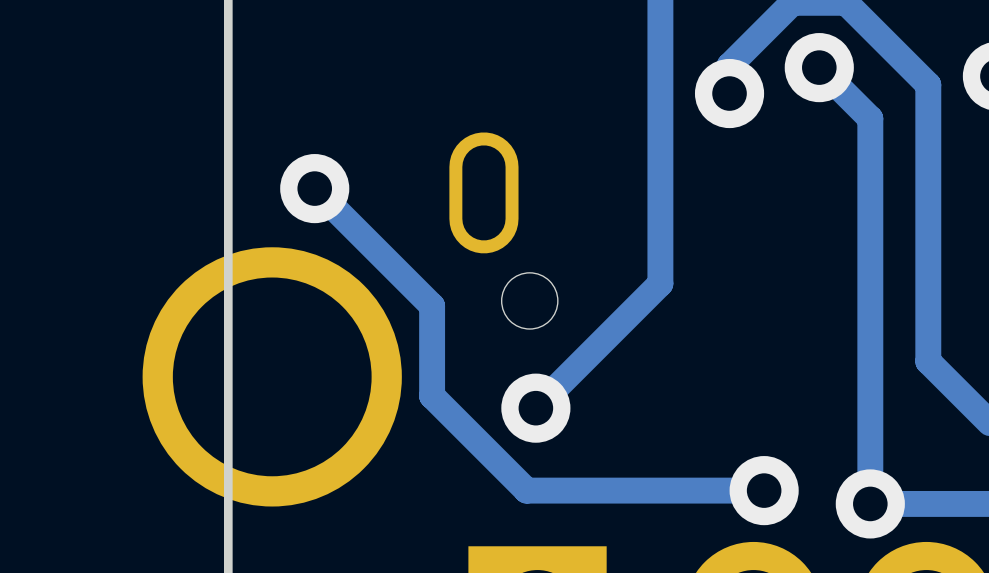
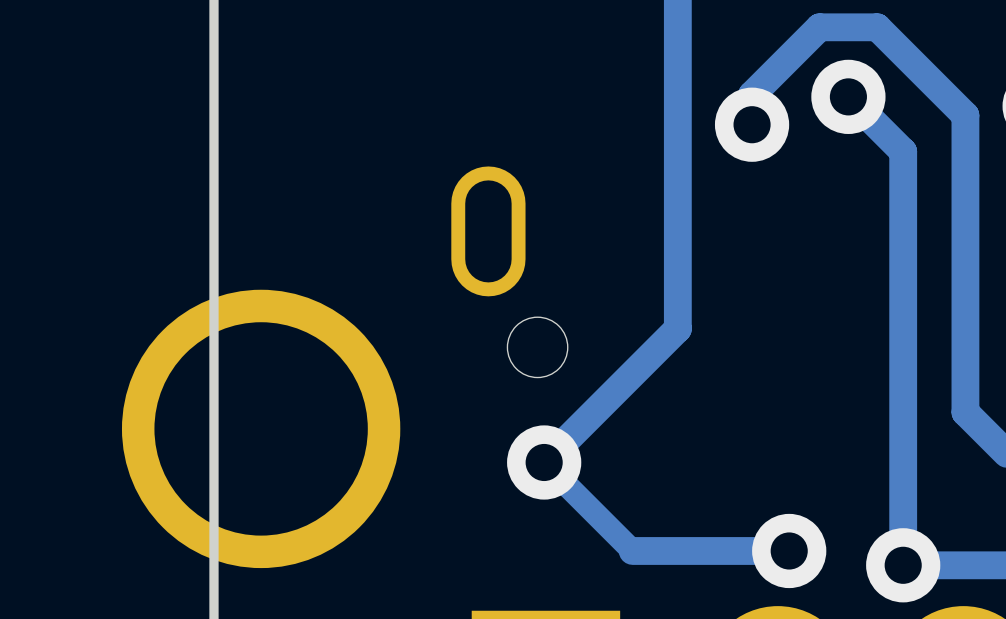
track: (314, 188) (432, 305) (432, 395) (526, 490) (618, 490) -> (544, 462) (632, 550)
via: (314, 188) -> none

